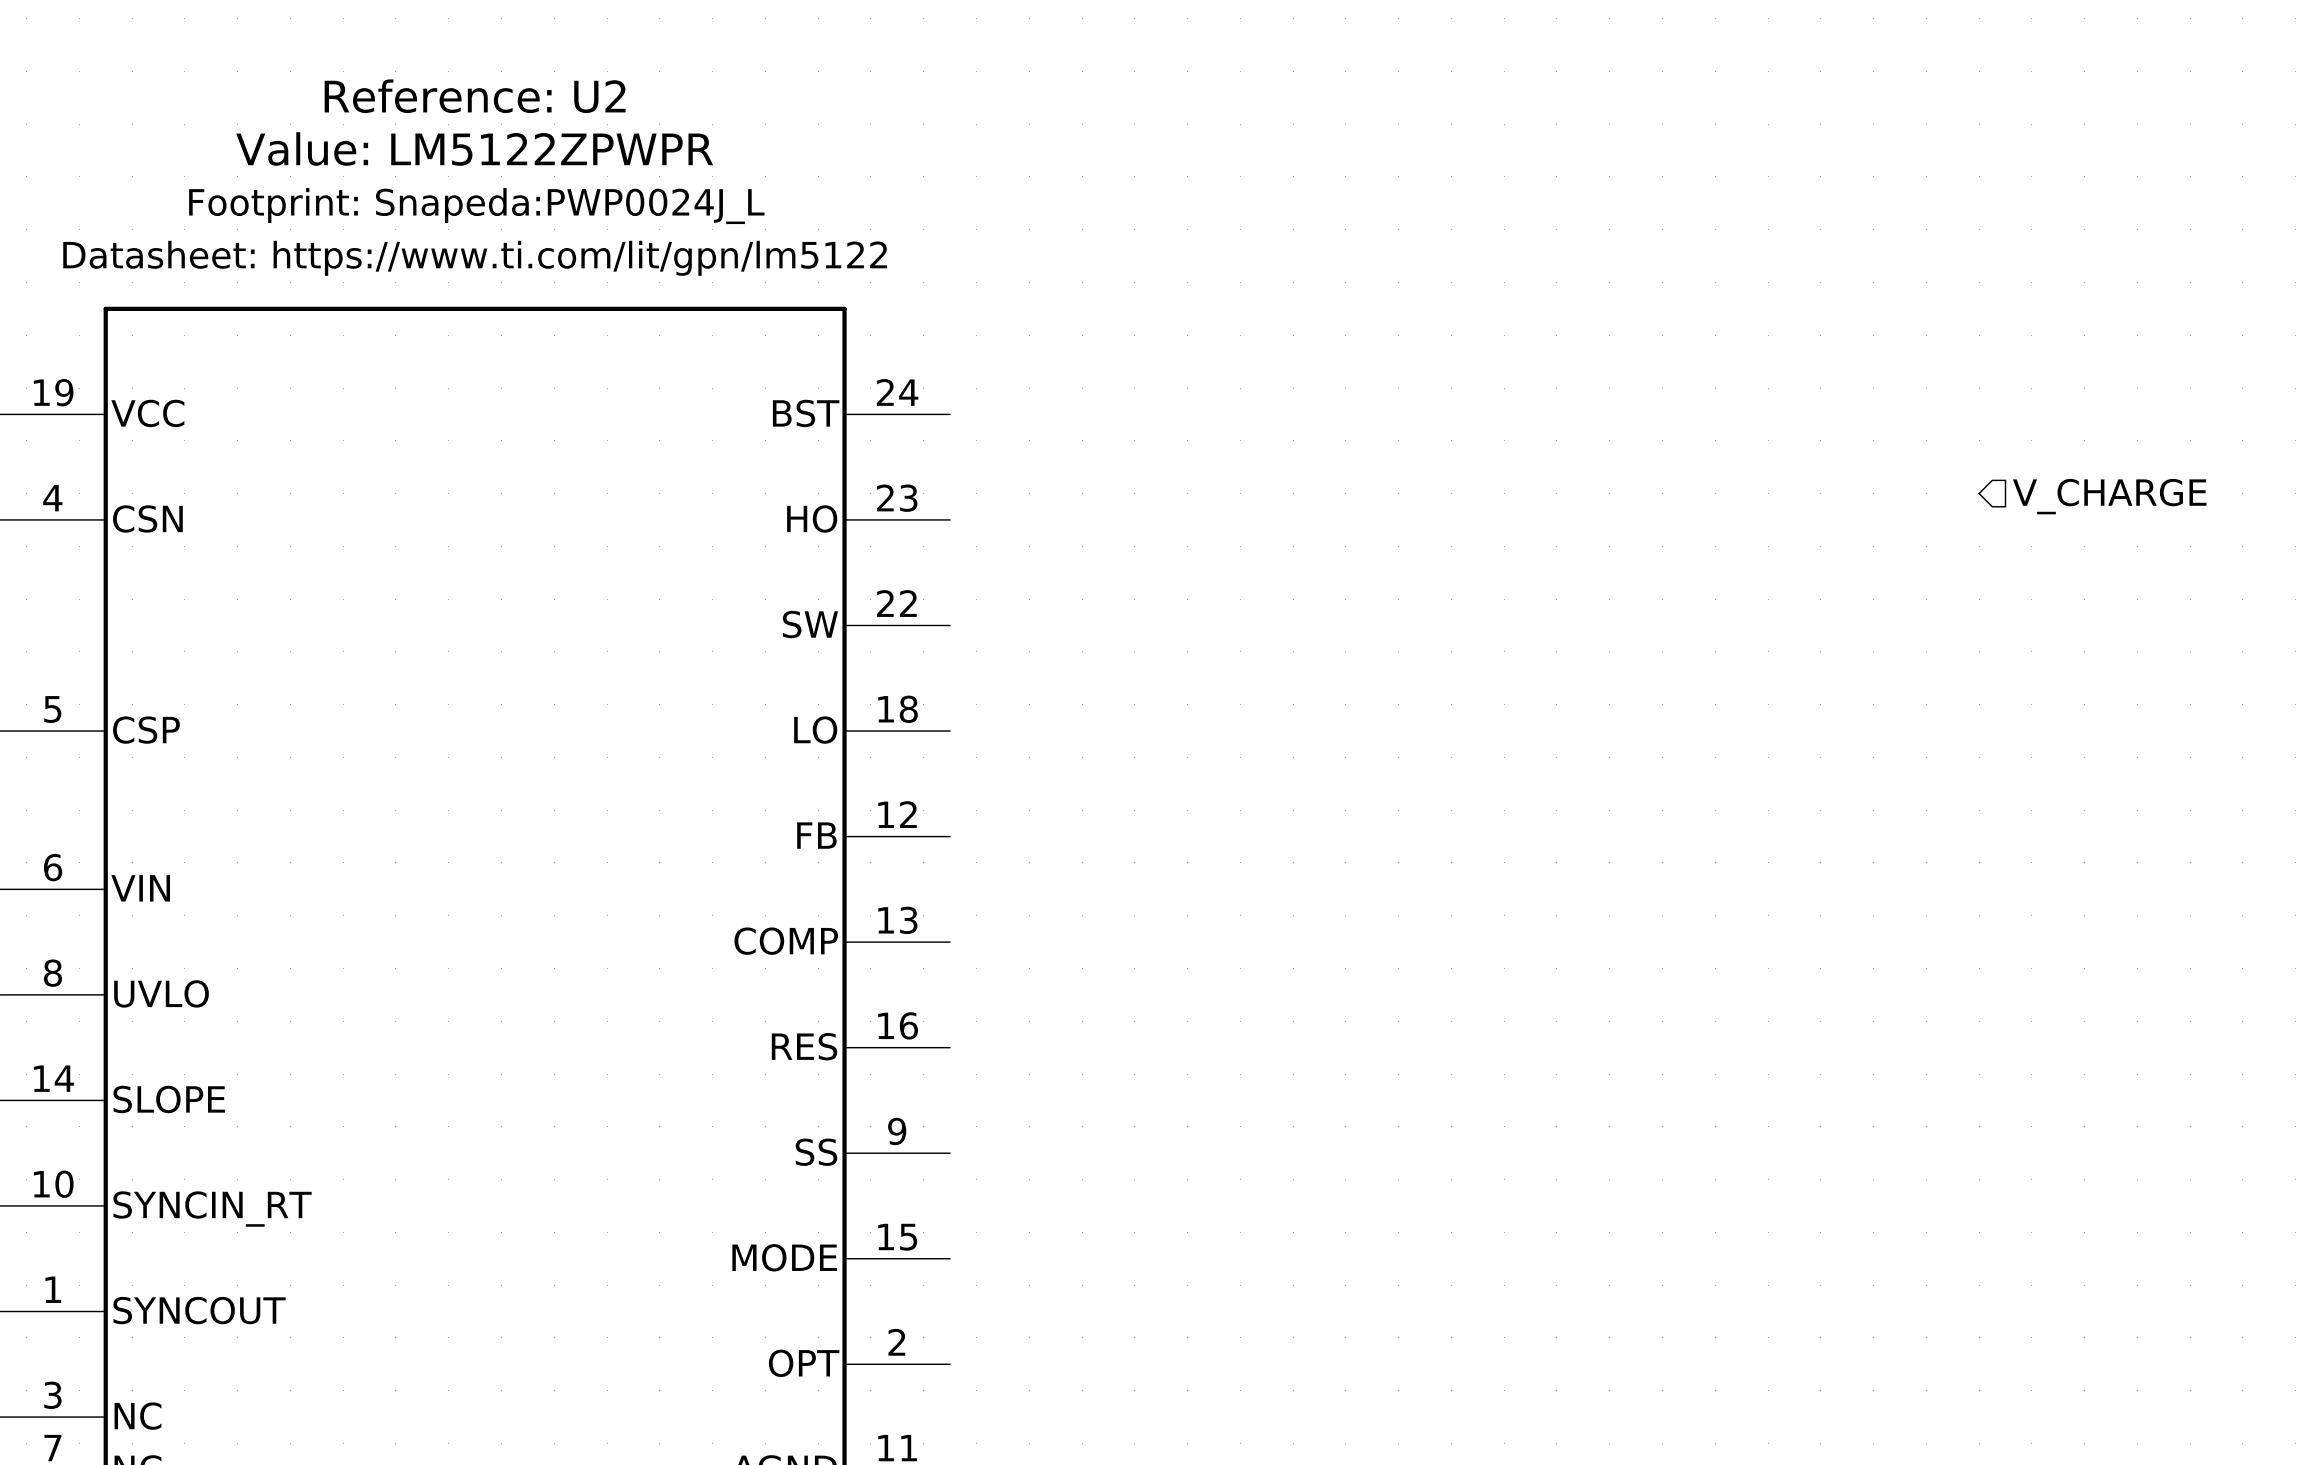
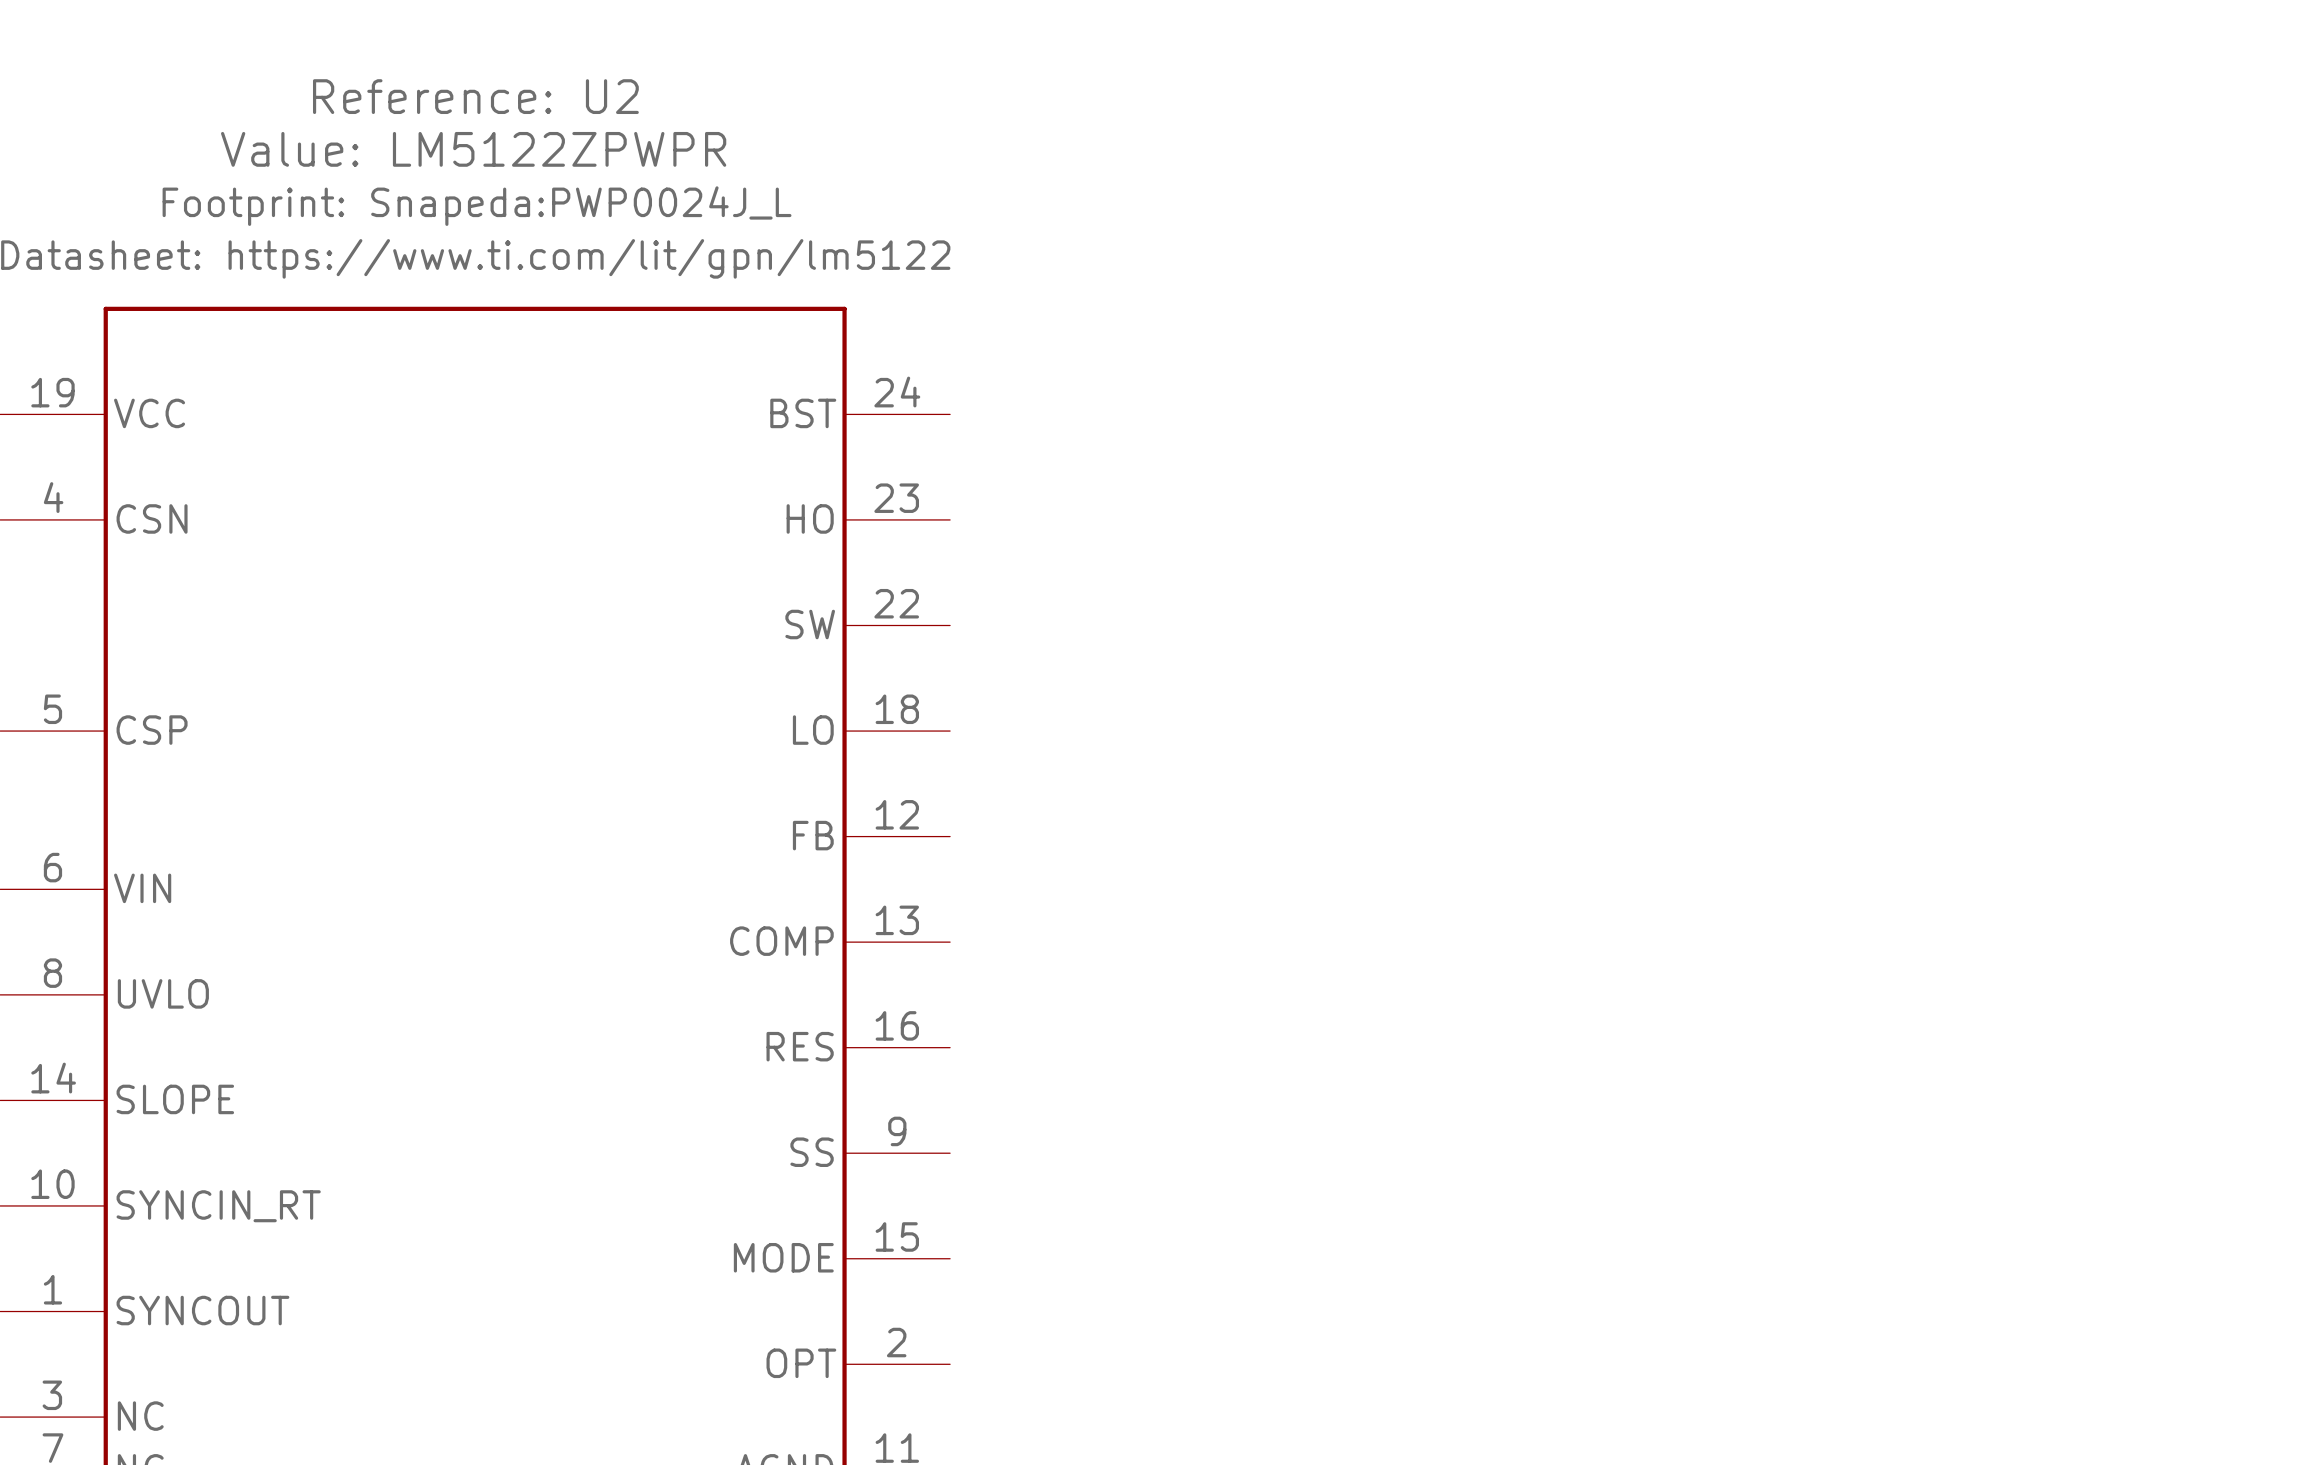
hierarchical label: V_CHARGE (2109, 496) -> none

